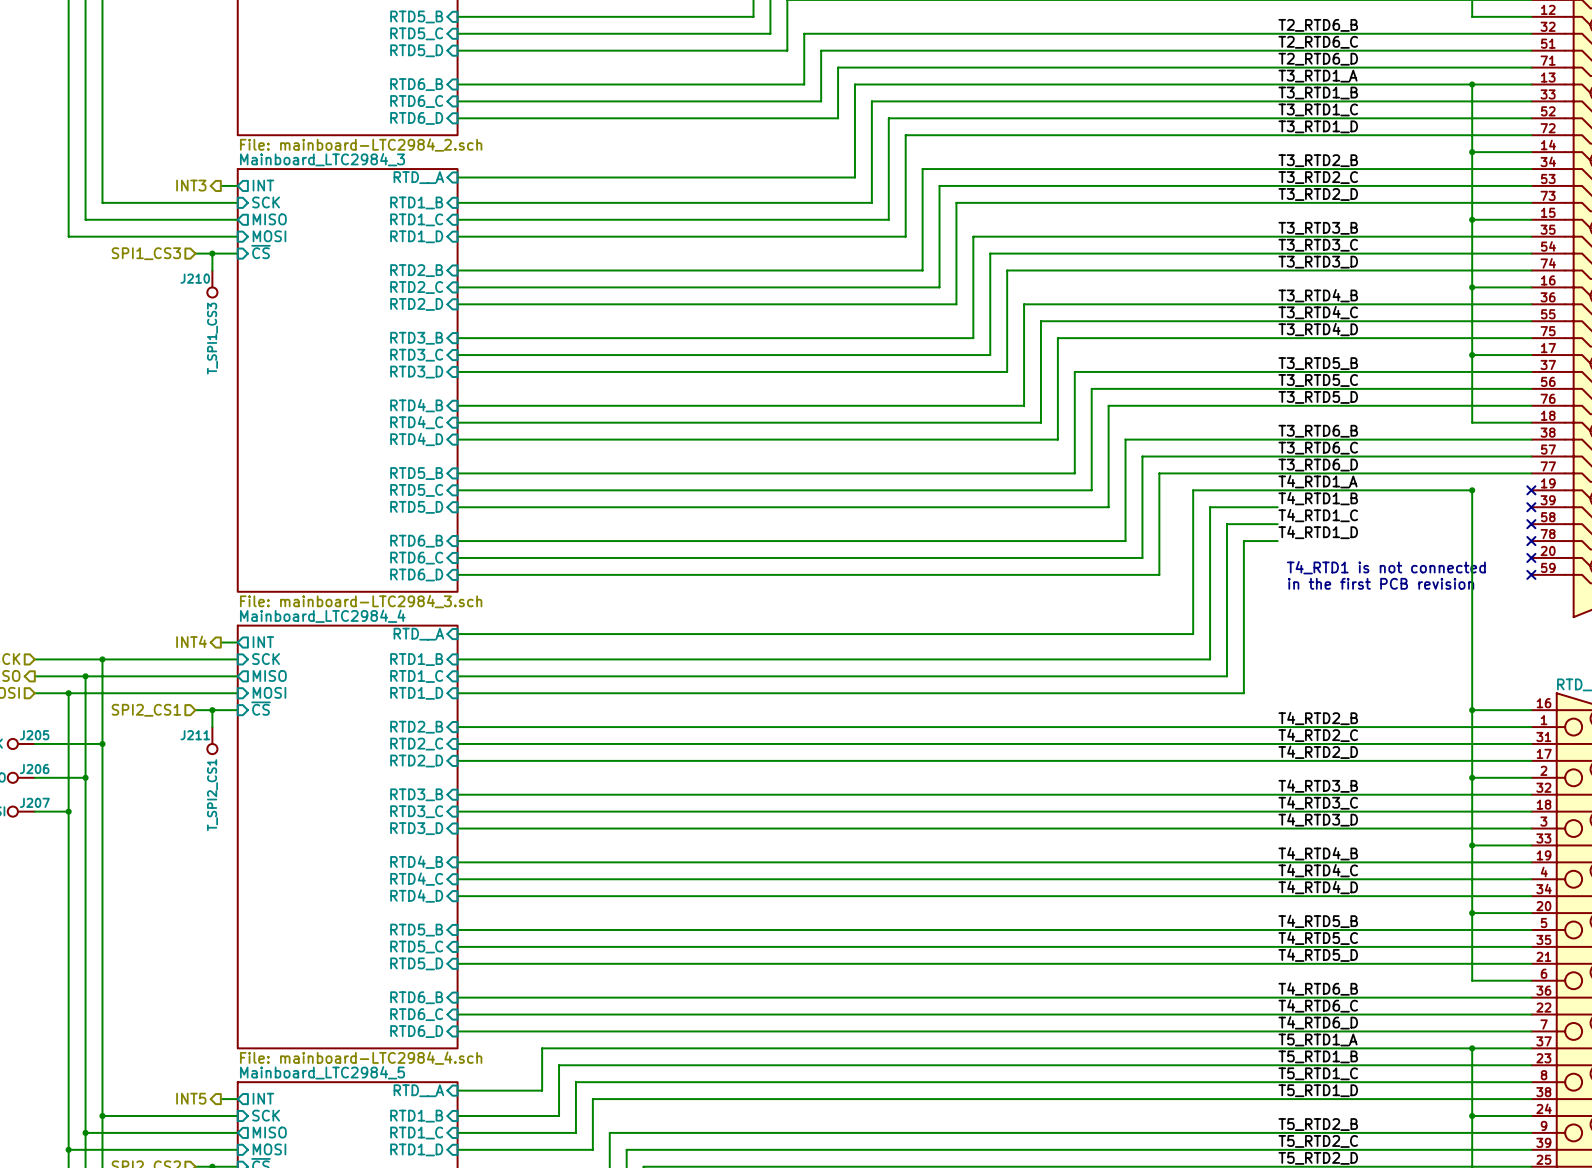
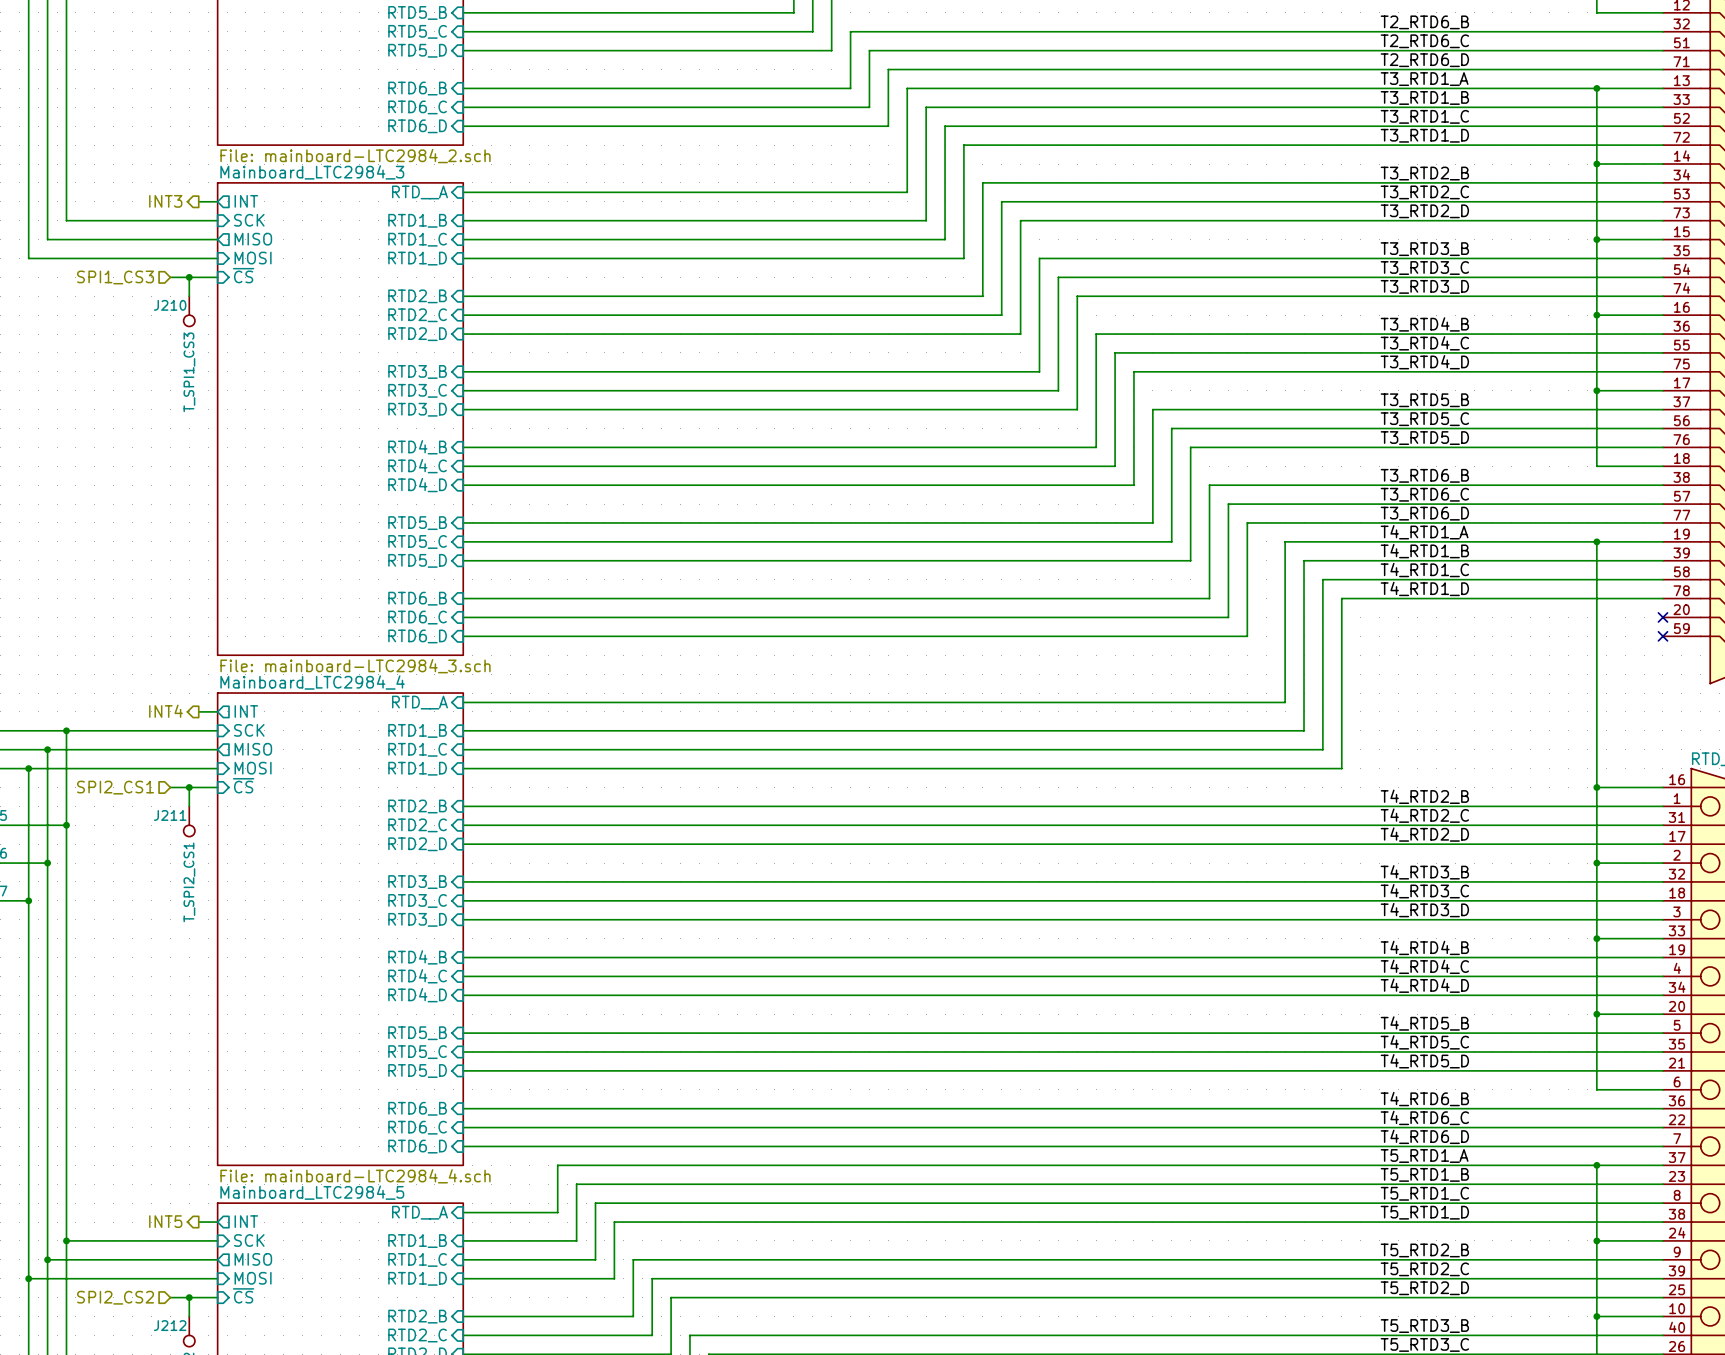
wire: none -> (1596, 541) (1662, 541)
no-connect mark: (1531, 490) -> none
wire: none -> (1379, 560) (1662, 560)
no-connect mark: (1531, 507) -> none
wire: none -> (1379, 579) (1662, 579)
no-connect mark: (1531, 524) -> none
wire: none -> (1379, 598) (1662, 598)
no-connect mark: (1531, 541) -> none
text: T4_RTD1 is not connected (1386, 567) -> none
text: in the first PCB revision (1381, 583) -> none

